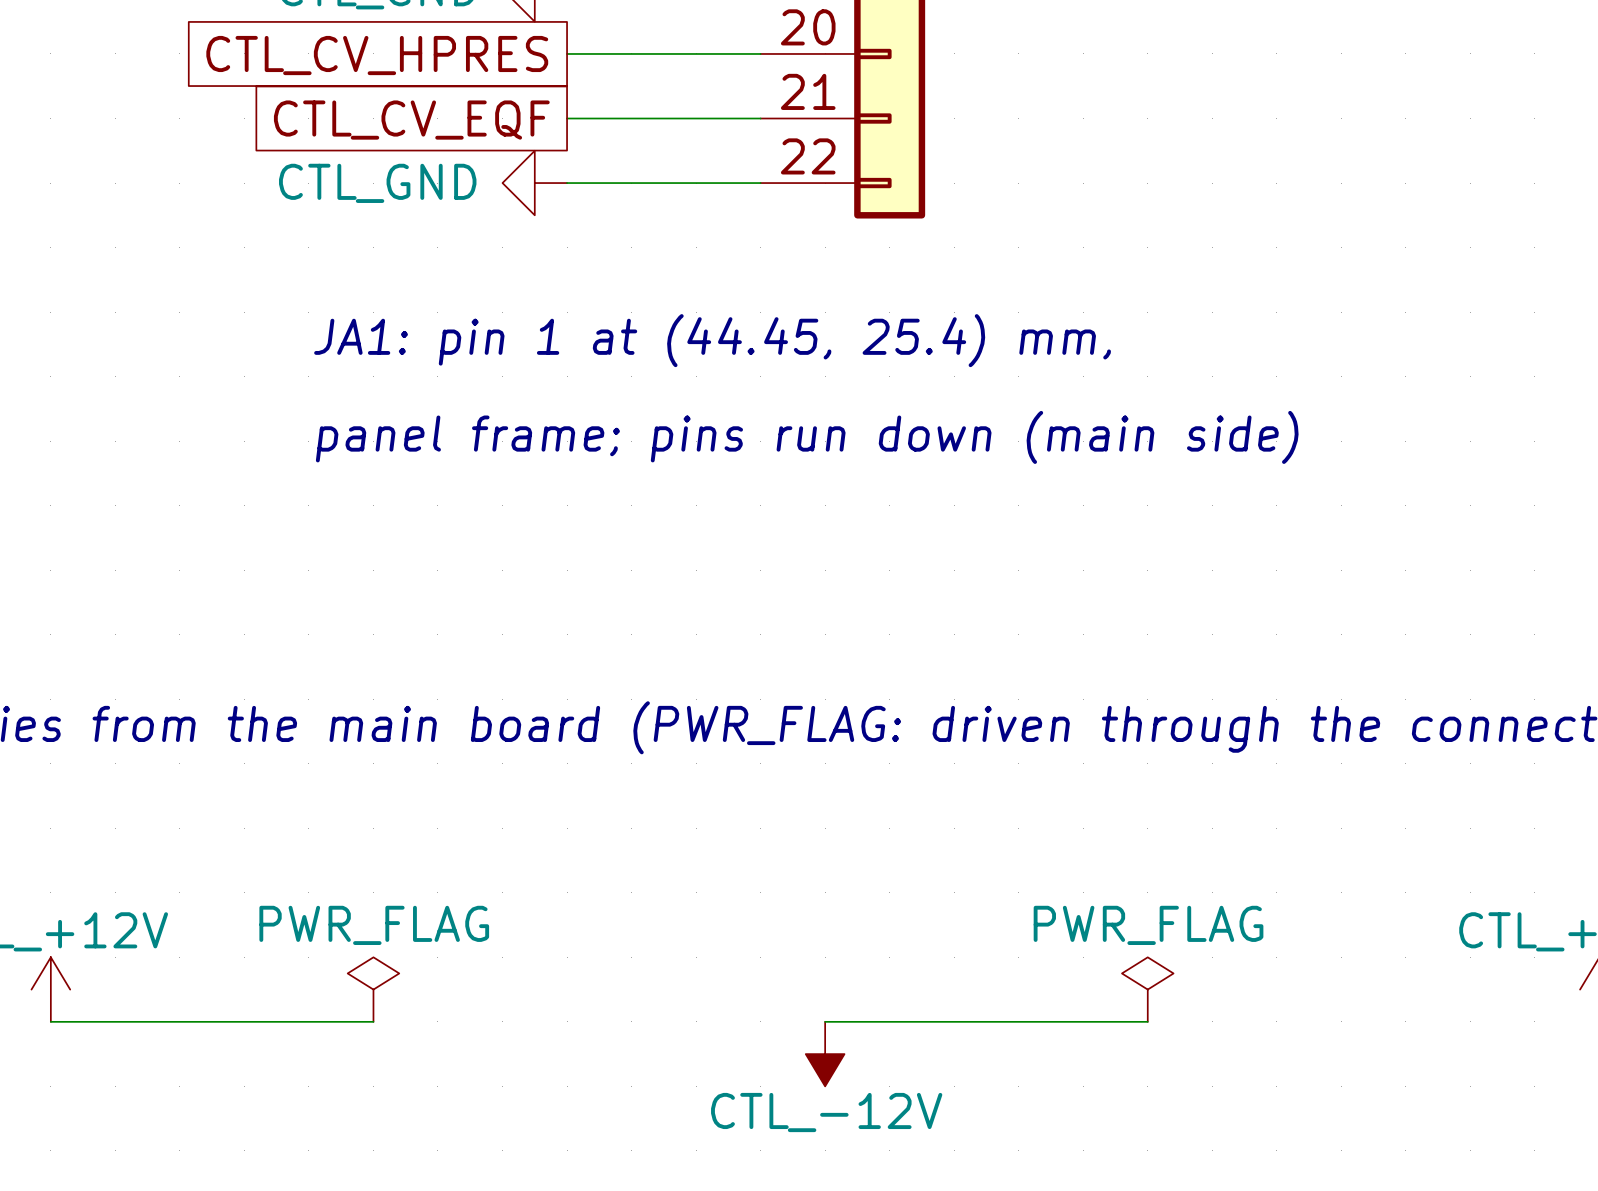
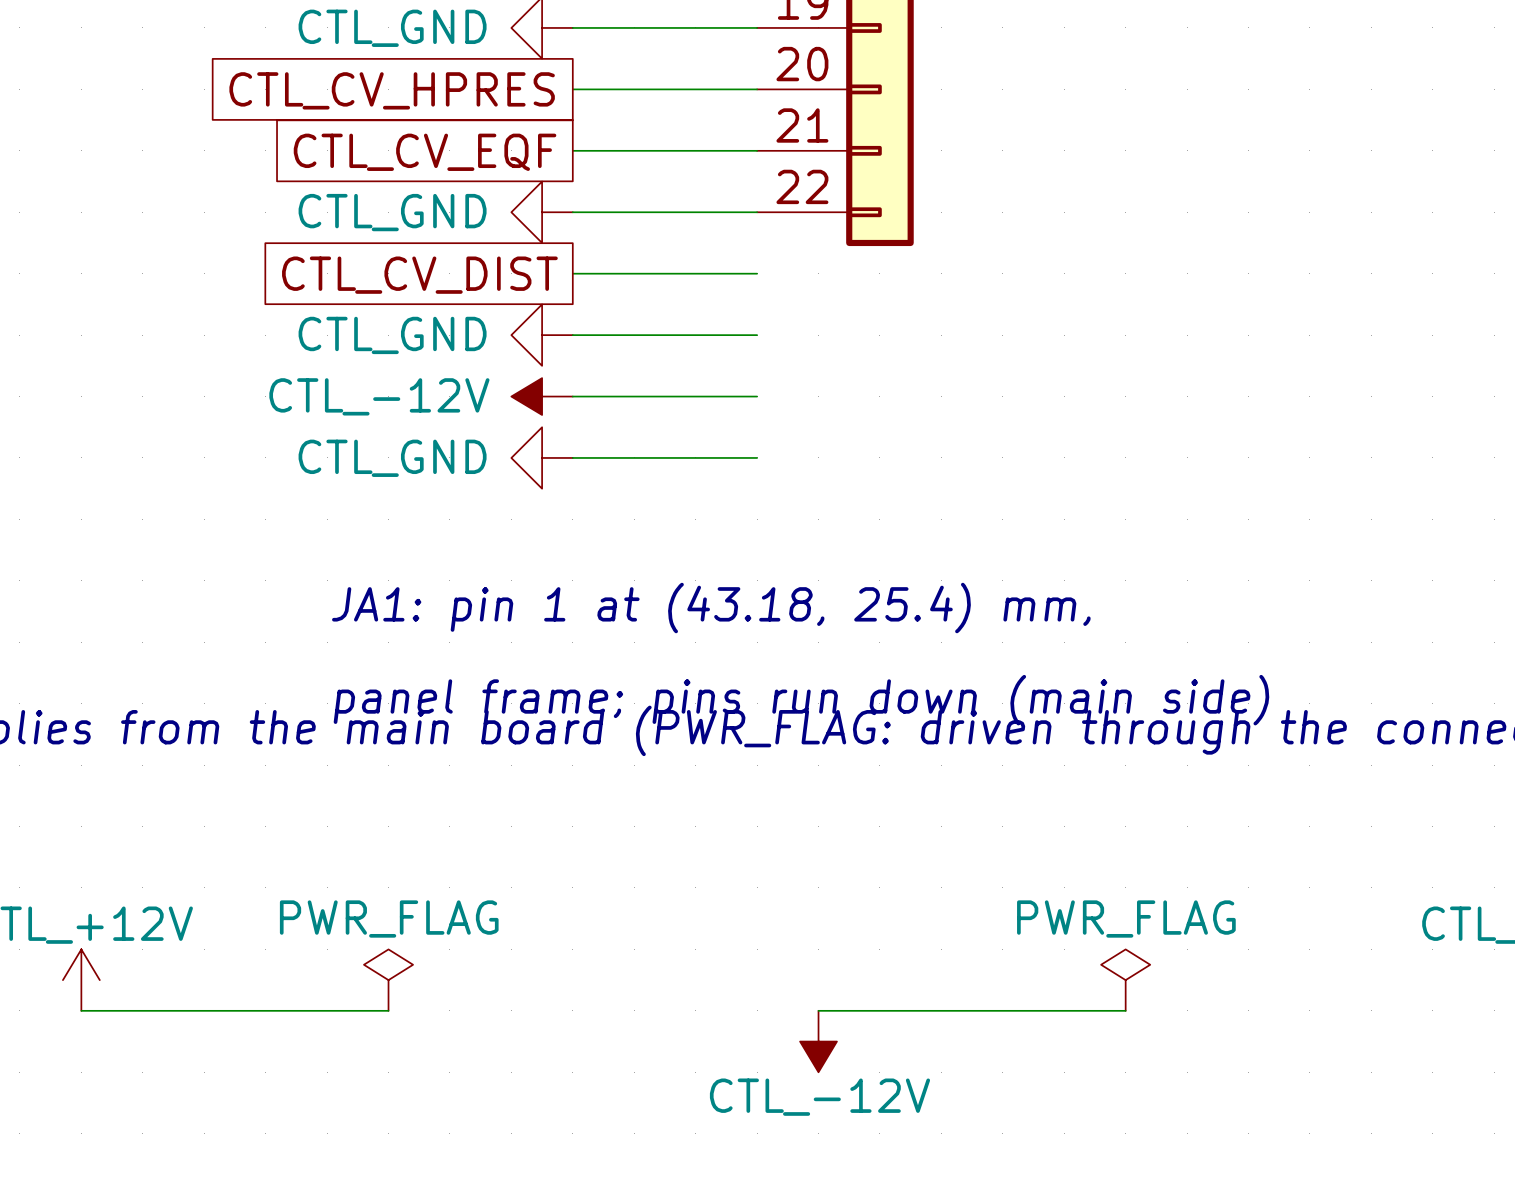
wire: none -> (572, 273) (757, 273)
global label: none -> CTL_CV_DIST (419, 275)
power symbol: none -> CTL_GND (542, 335)
wire: none -> (572, 335) (757, 335)
text: JA1: pin 1 at (44.45, 25.4) mm, (712, 340) -> none
power symbol: none -> CTL_-12V (542, 396)
wire: none -> (572, 396) (757, 396)
text position: panel frame; pins run down (main side) (807, 437) -> panel frame; pins run down (main side) (801, 700)
power symbol: none -> CTL_GND (542, 457)
wire: none -> (572, 457) (757, 457)
text: none -> JA1: pin 1 at (43.18, 25.4) mm, (711, 608)

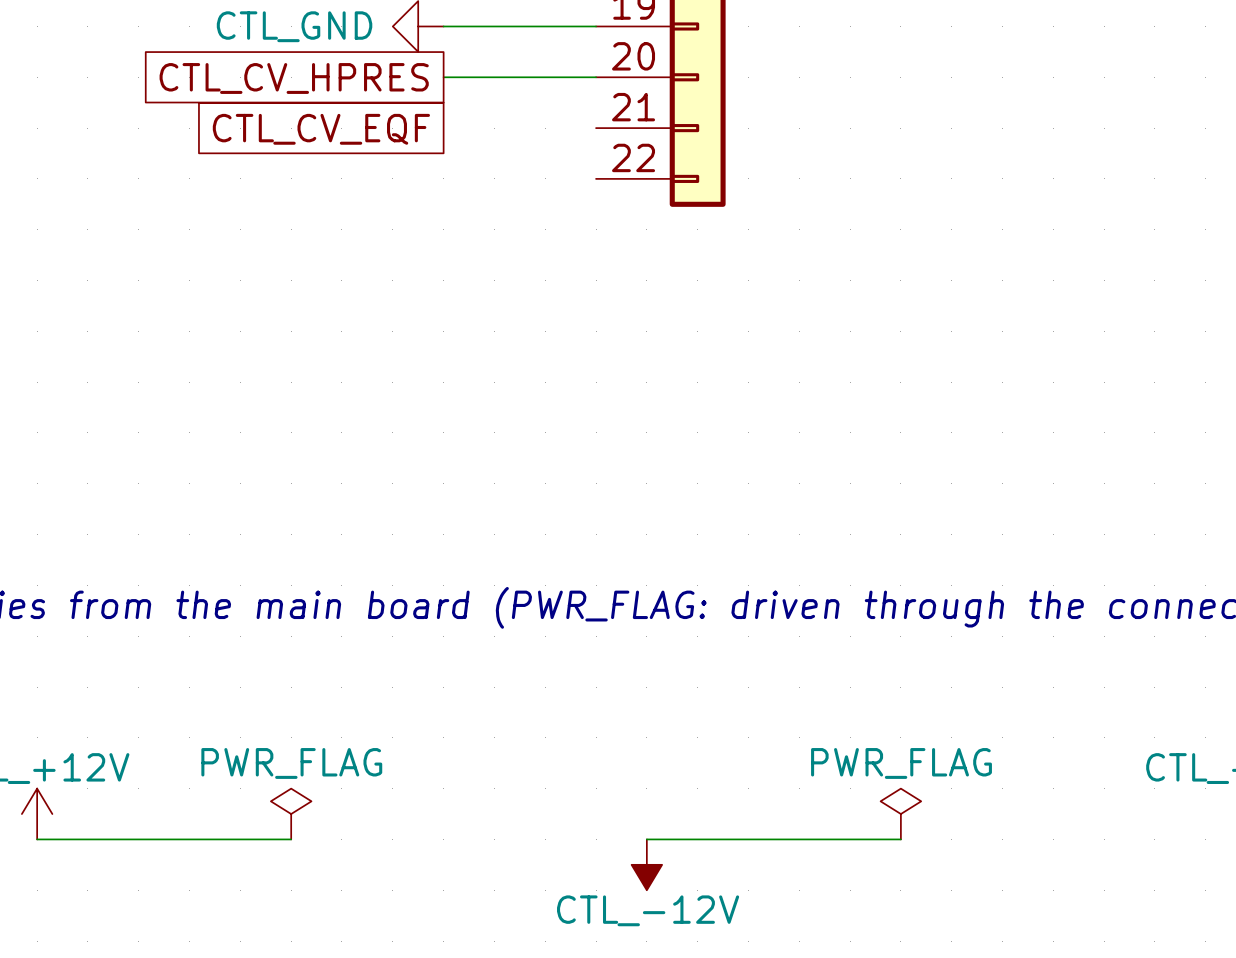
wire: (572, 150) (757, 150) -> none
power symbol: CTL_GND (542, 212) -> none
wire: (572, 212) (757, 212) -> none
wire: (572, 273) (757, 273) -> none
global label: CTL_CV_DIST (419, 275) -> none
power symbol: CTL_GND (542, 335) -> none
wire: (572, 335) (757, 335) -> none
power symbol: CTL_-12V (542, 396) -> none
wire: (572, 396) (757, 396) -> none
power symbol: CTL_GND (542, 457) -> none
wire: (572, 457) (757, 457) -> none
text: JA1: pin 1 at (43.18, 25.4) mm, (711, 608) -> none
text: panel frame; pins run down (main side) (801, 700) -> none

